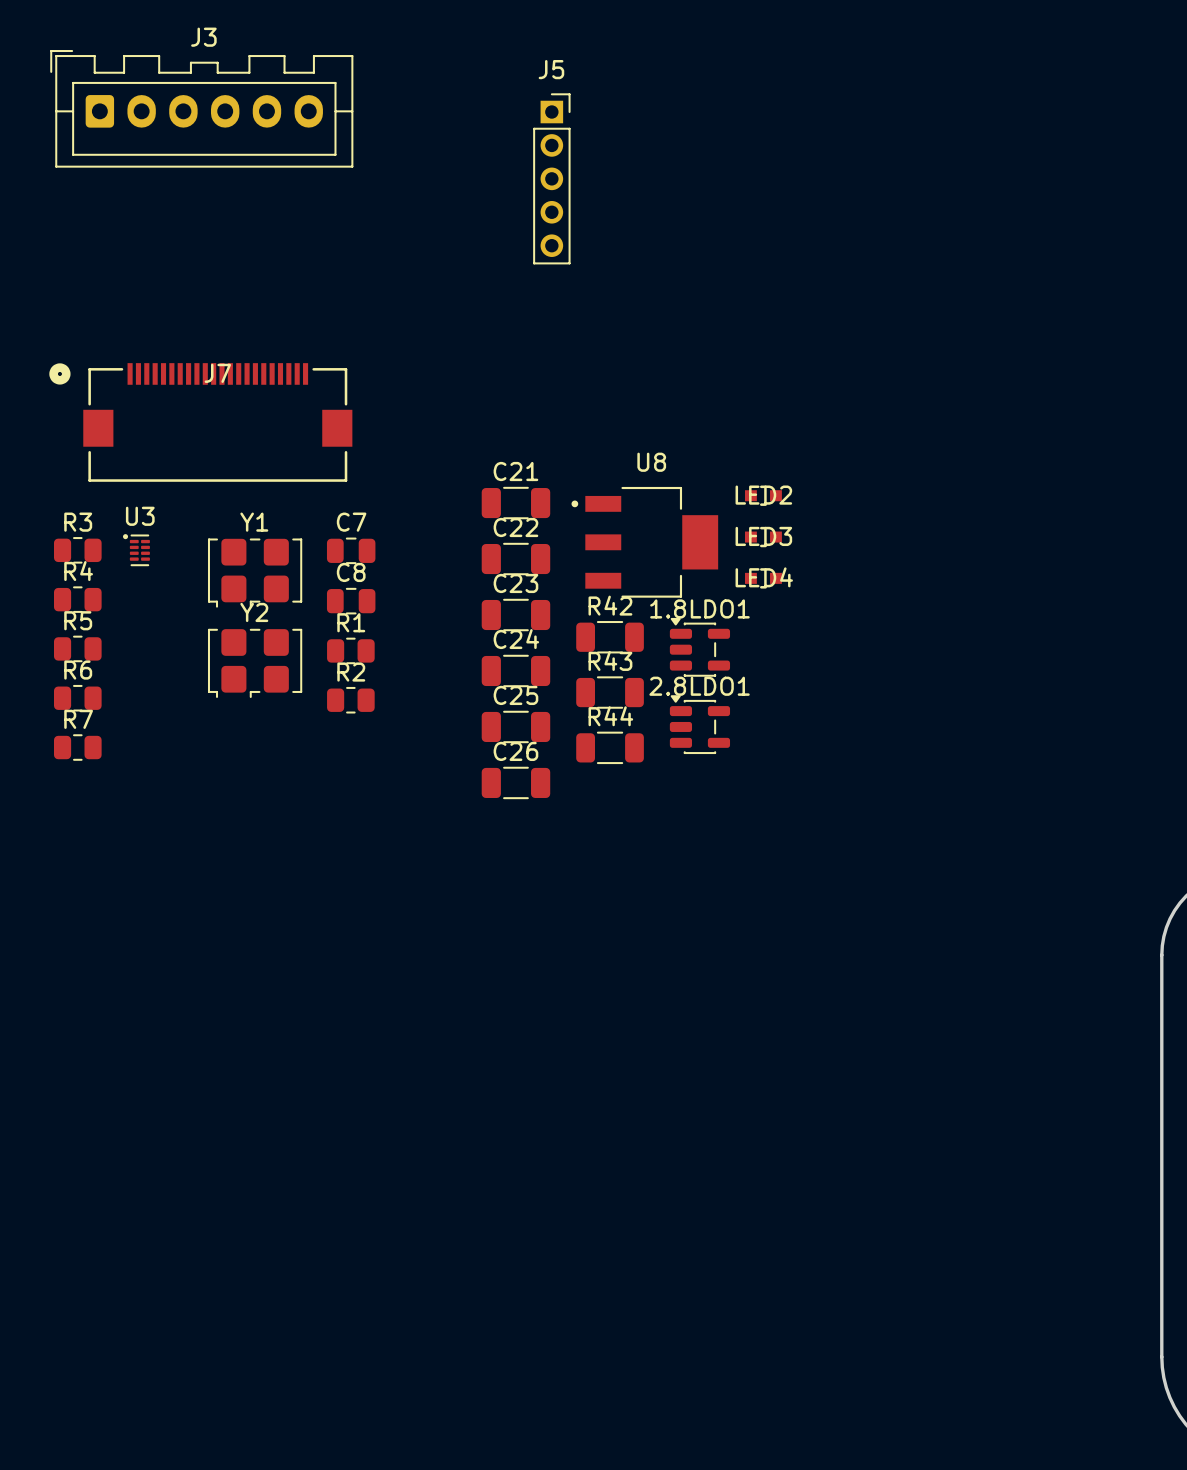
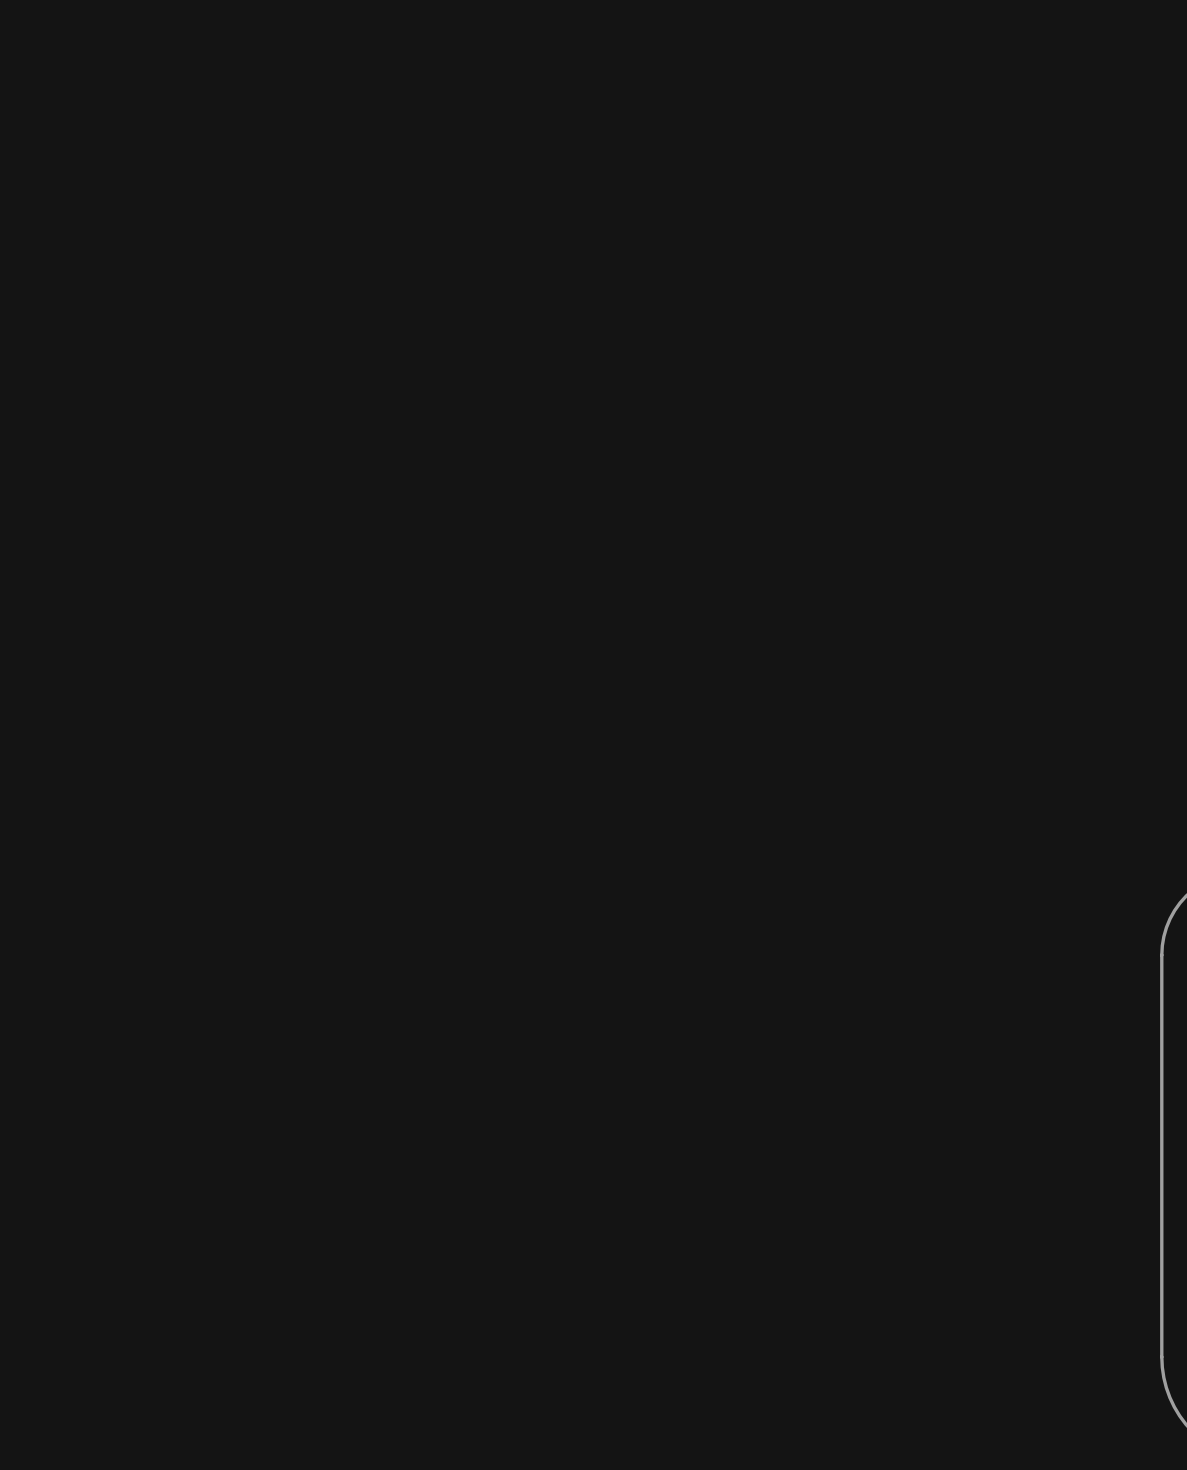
J3: (201, 108) -> none
J5: (551, 178) -> none
J7: (200, 422) -> none
LED2: (763, 495) -> none
C21: (515, 503) -> none
LED3: (763, 537) -> none
U8: (644, 542) -> none
R3: (77, 550) -> none
U3: (136, 550) -> none
C7: (351, 550) -> none
C22: (515, 559) -> none
Y1: (255, 573) -> none
LED4: (763, 578) -> none
R4: (77, 599) -> none
C8: (351, 601) -> none
C23: (515, 615) -> none
R42: (610, 637) -> none
1.8LDO1: (699, 647) -> none
R5: (77, 648) -> none
R1: (350, 650) -> none
Y2: (255, 663) -> none
C24: (515, 670) -> none
R43: (610, 692) -> none
R6: (77, 698) -> none
R2: (350, 700) -> none
2.8LDO1: (699, 724) -> none
C25: (515, 726) -> none
R7: (77, 747) -> none
R44: (610, 747) -> none
C26: (515, 782) -> none

